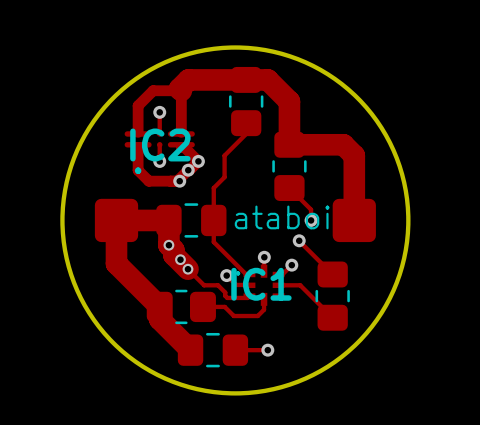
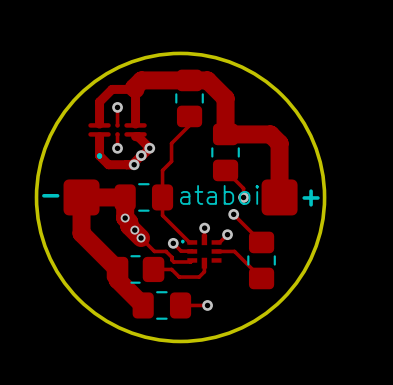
IC2 name: IC2 (160, 144) -> none
text: none -> - (50, 195)
text: none -> + (311, 197)
IC1 name: IC1 (261, 284) -> none

